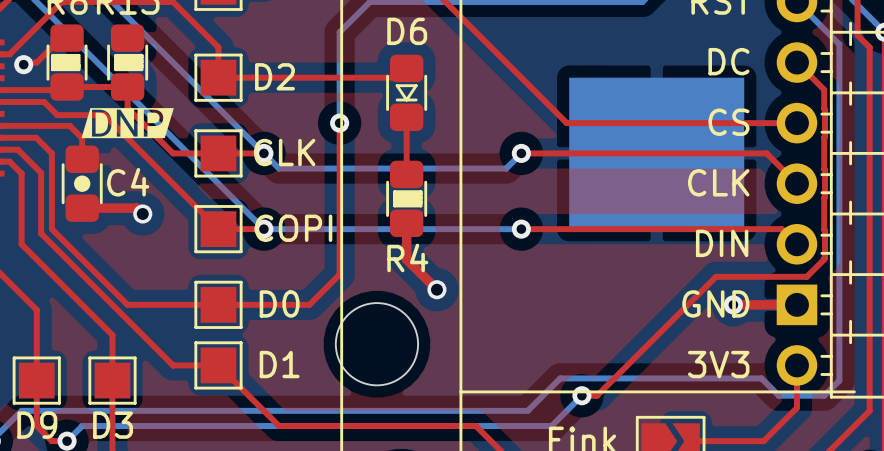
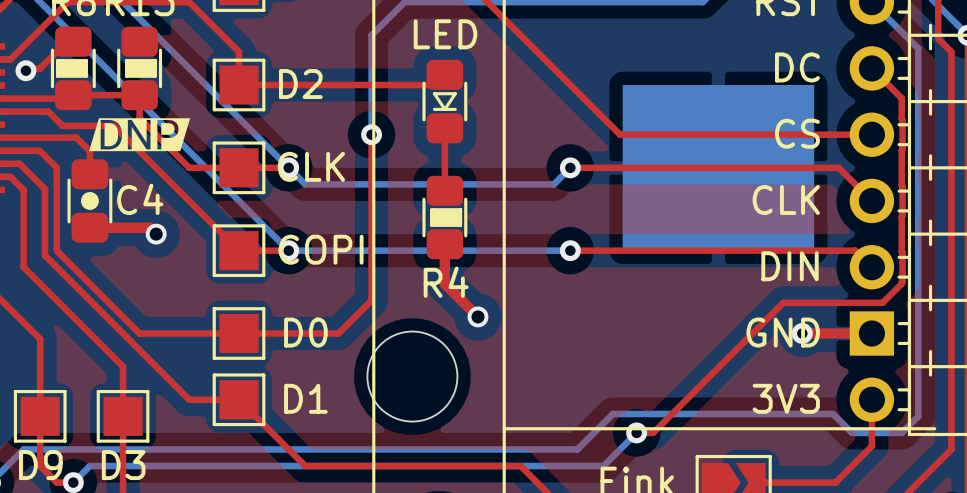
D6 name: D6 (407, 31) -> LED (445, 34)

